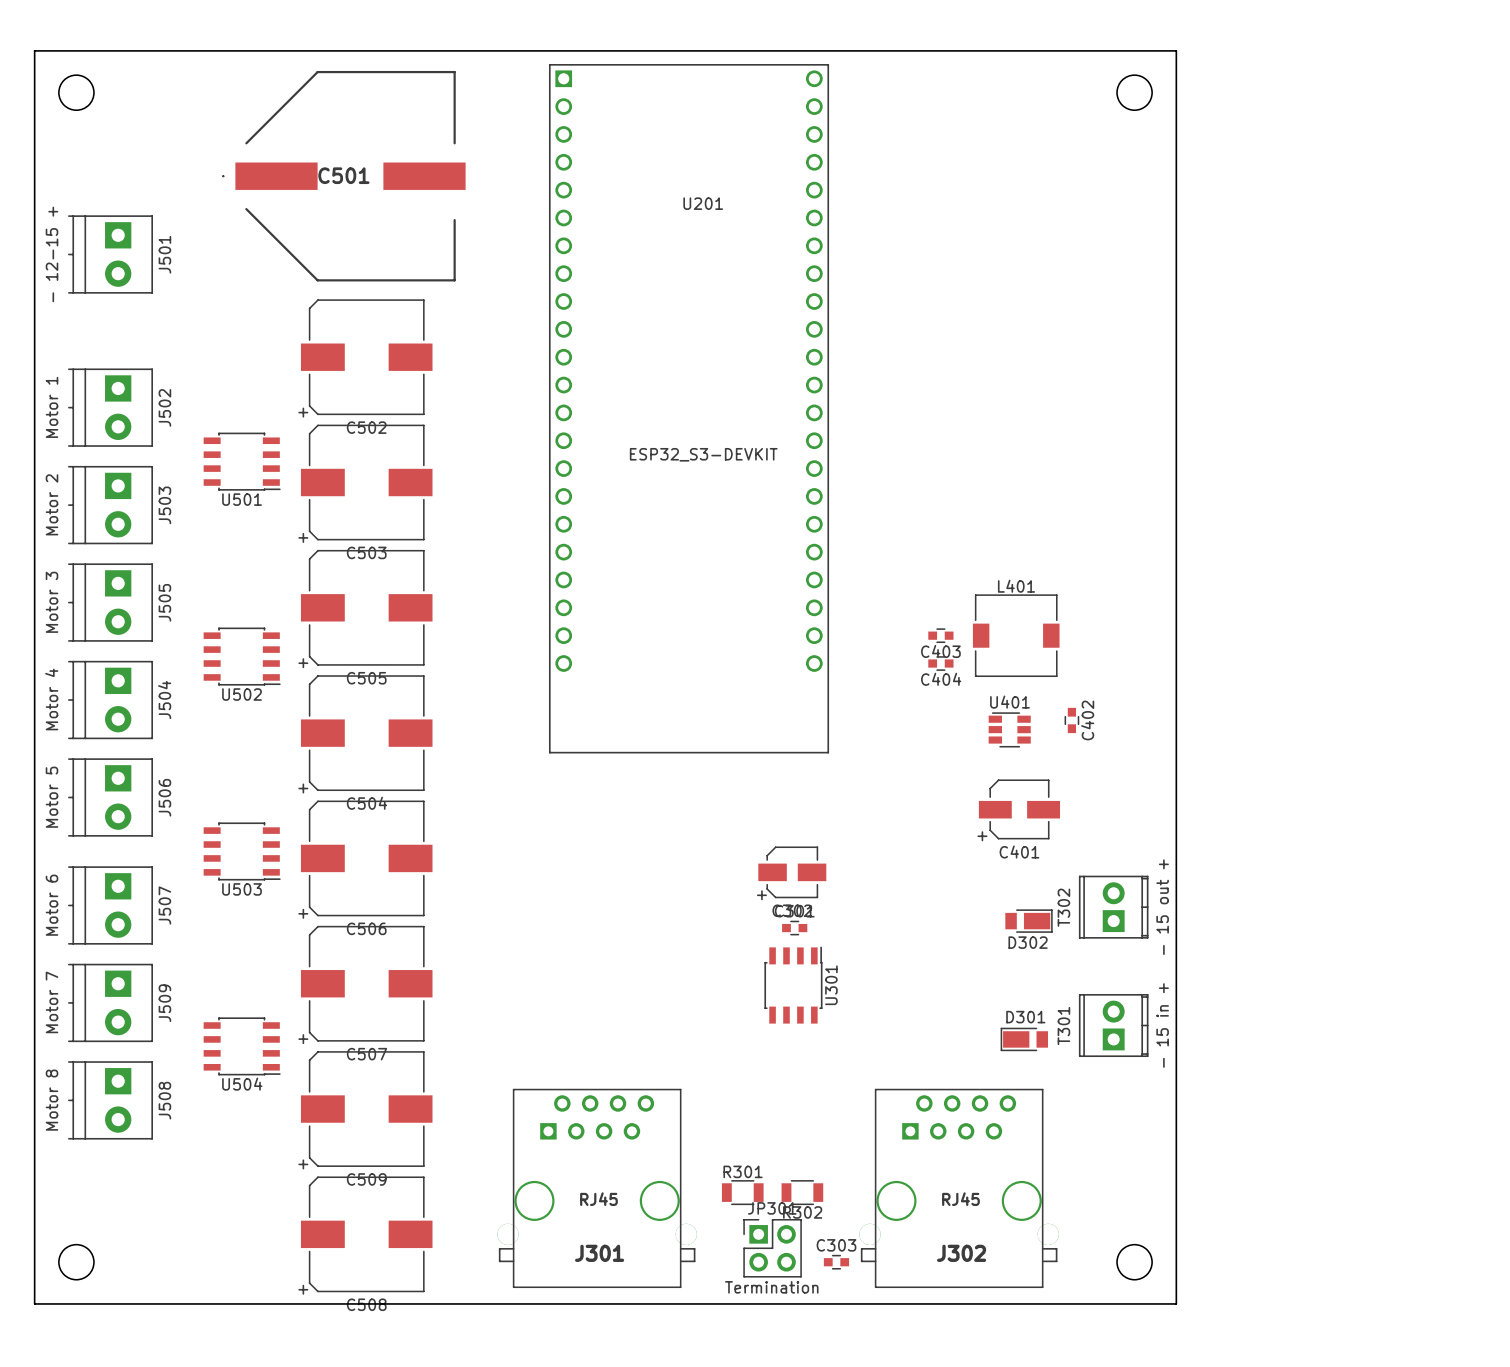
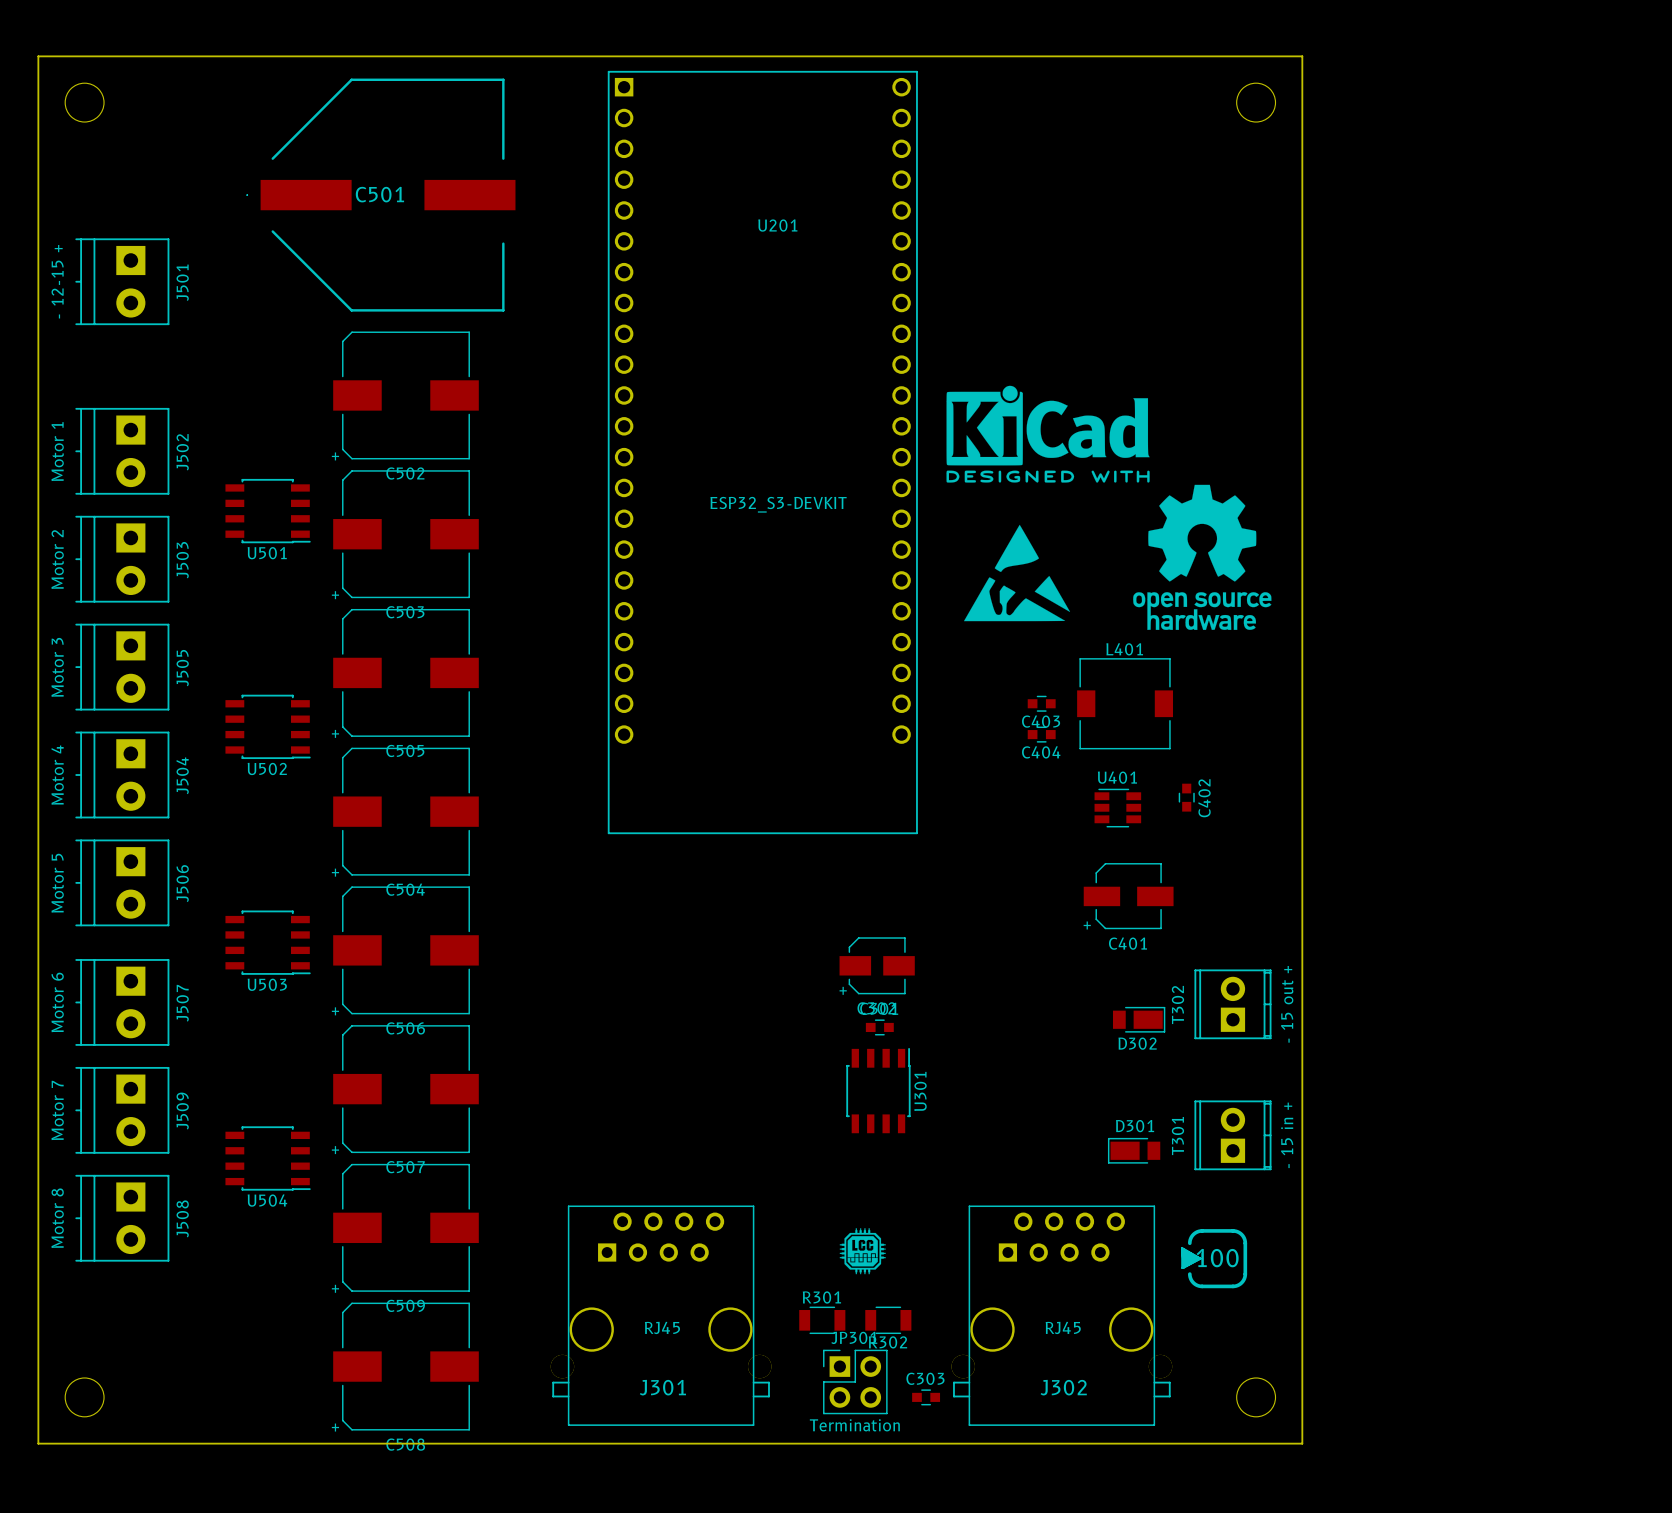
drawing: none -> [946, 385, 1272, 630]
drawing: none -> [963, 524, 1071, 622]
drawing: none -> [839, 1228, 886, 1275]
drawing: none -> [1181, 1229, 1248, 1289]

